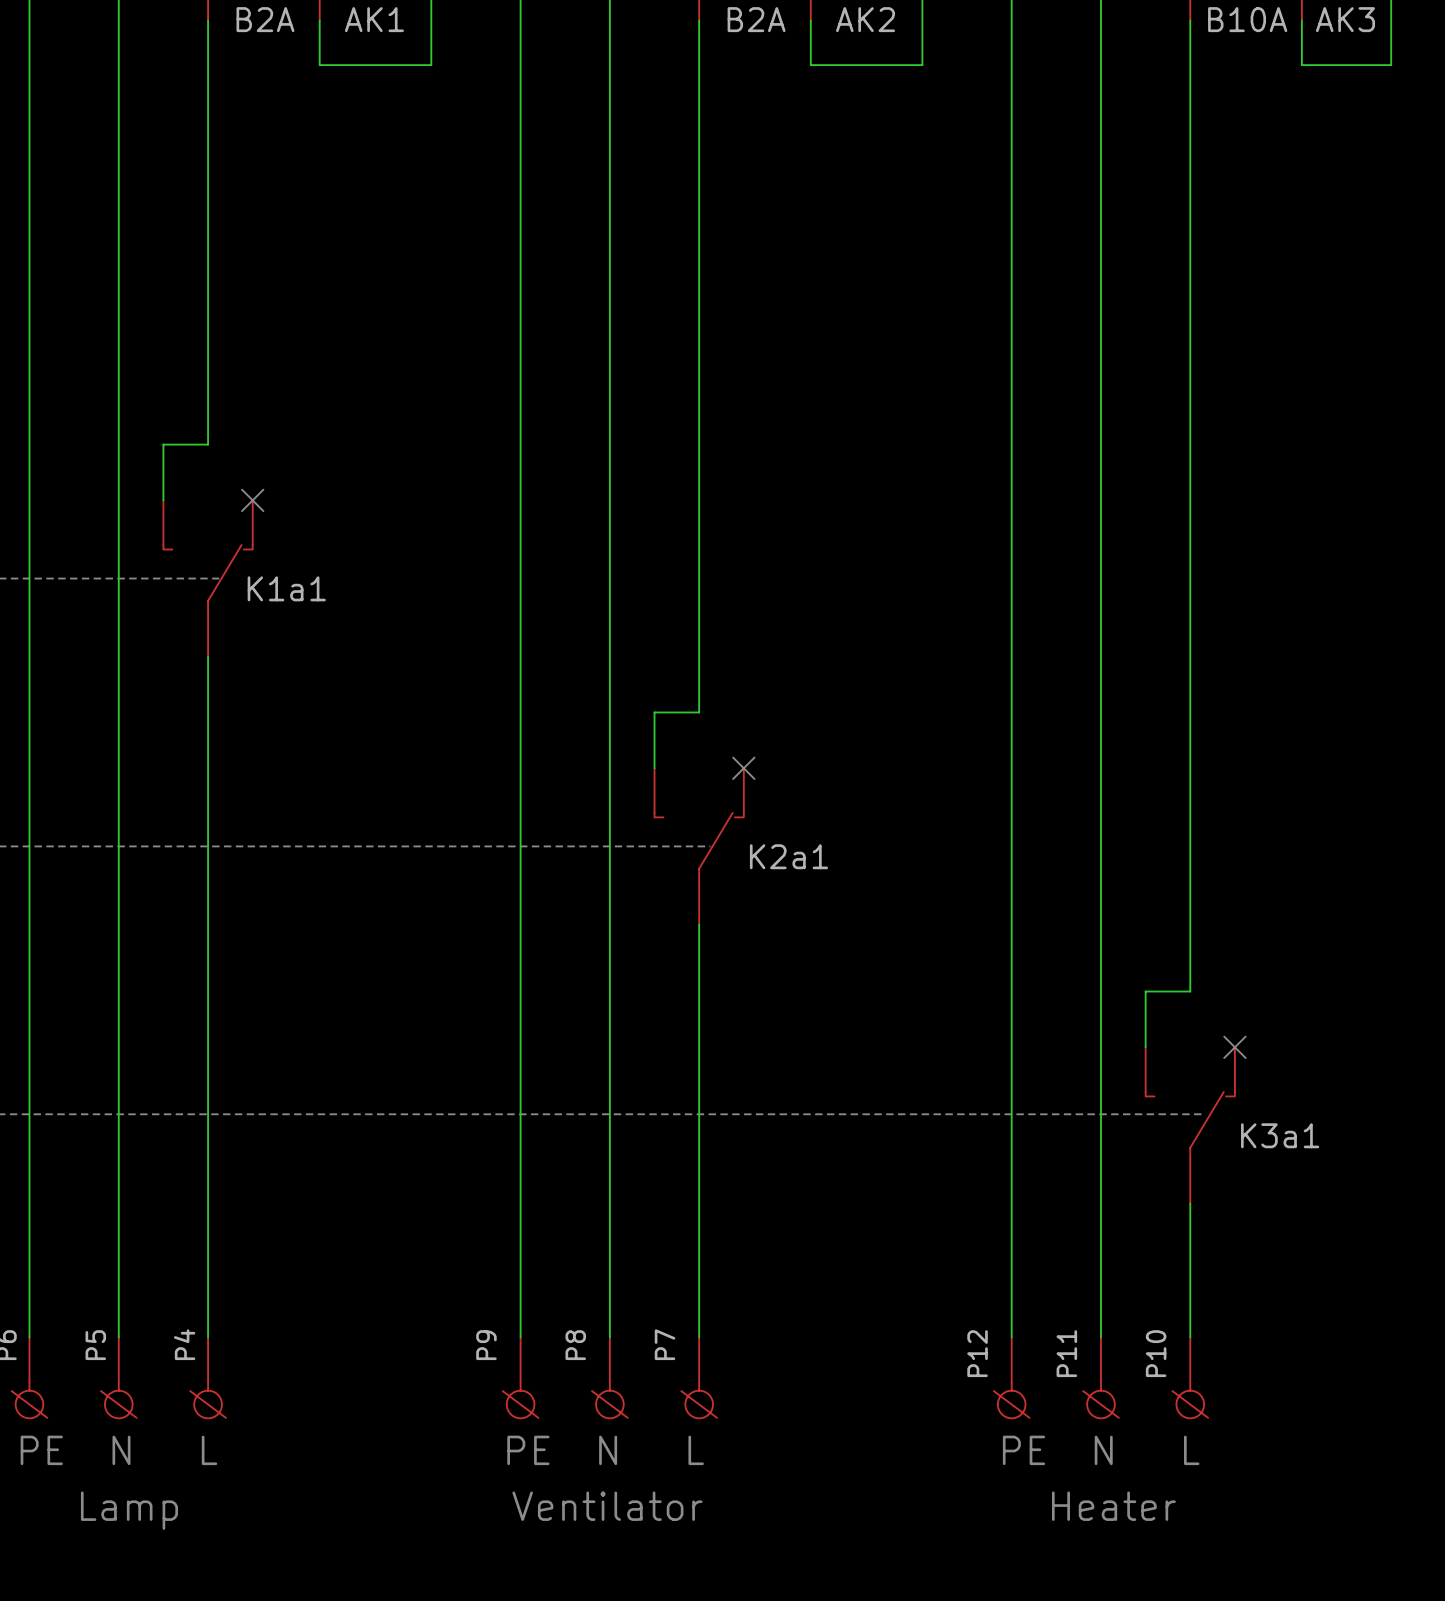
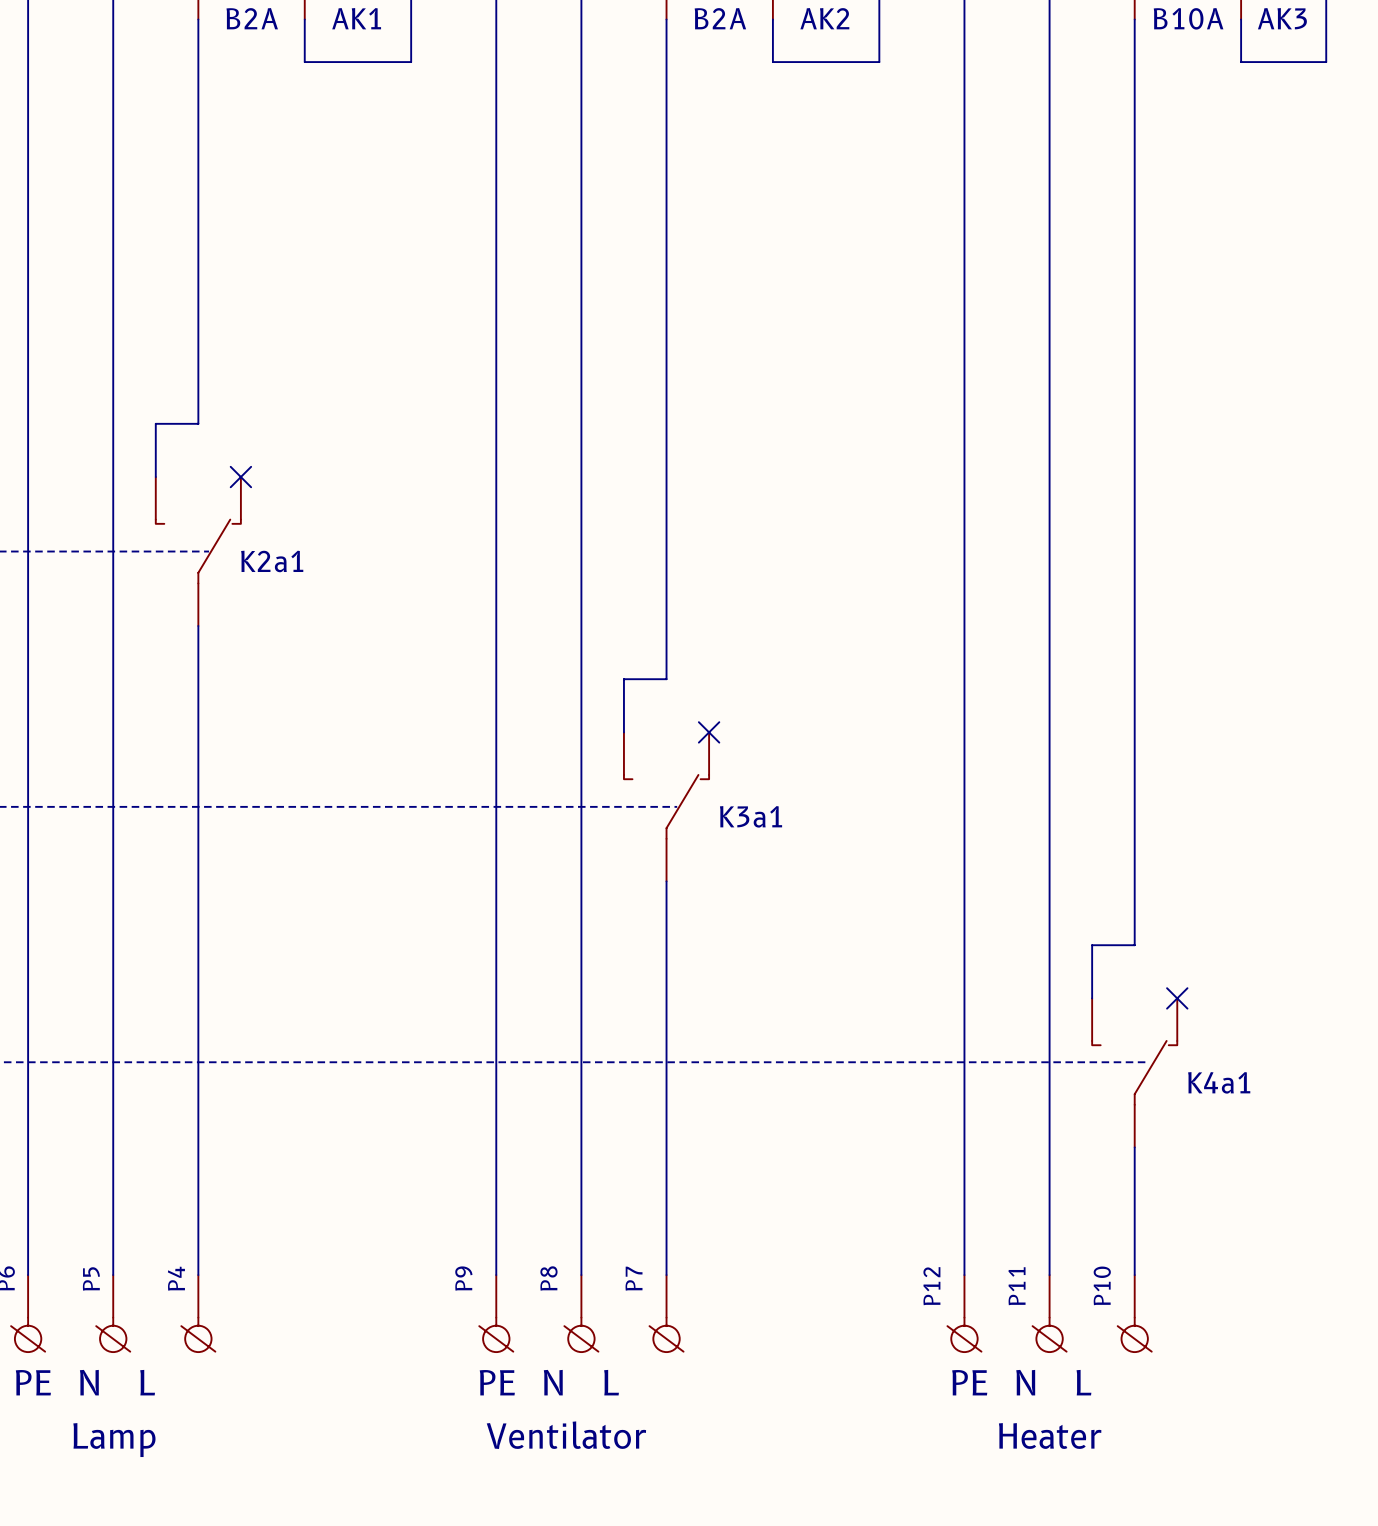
K1a1 name: K1a1 (286, 588) -> K2a1 (272, 561)
K2a1 name: K2a1 (789, 856) -> K3a1 (751, 816)
K3a1 name: K3a1 (1280, 1135) -> K4a1 (1219, 1082)

